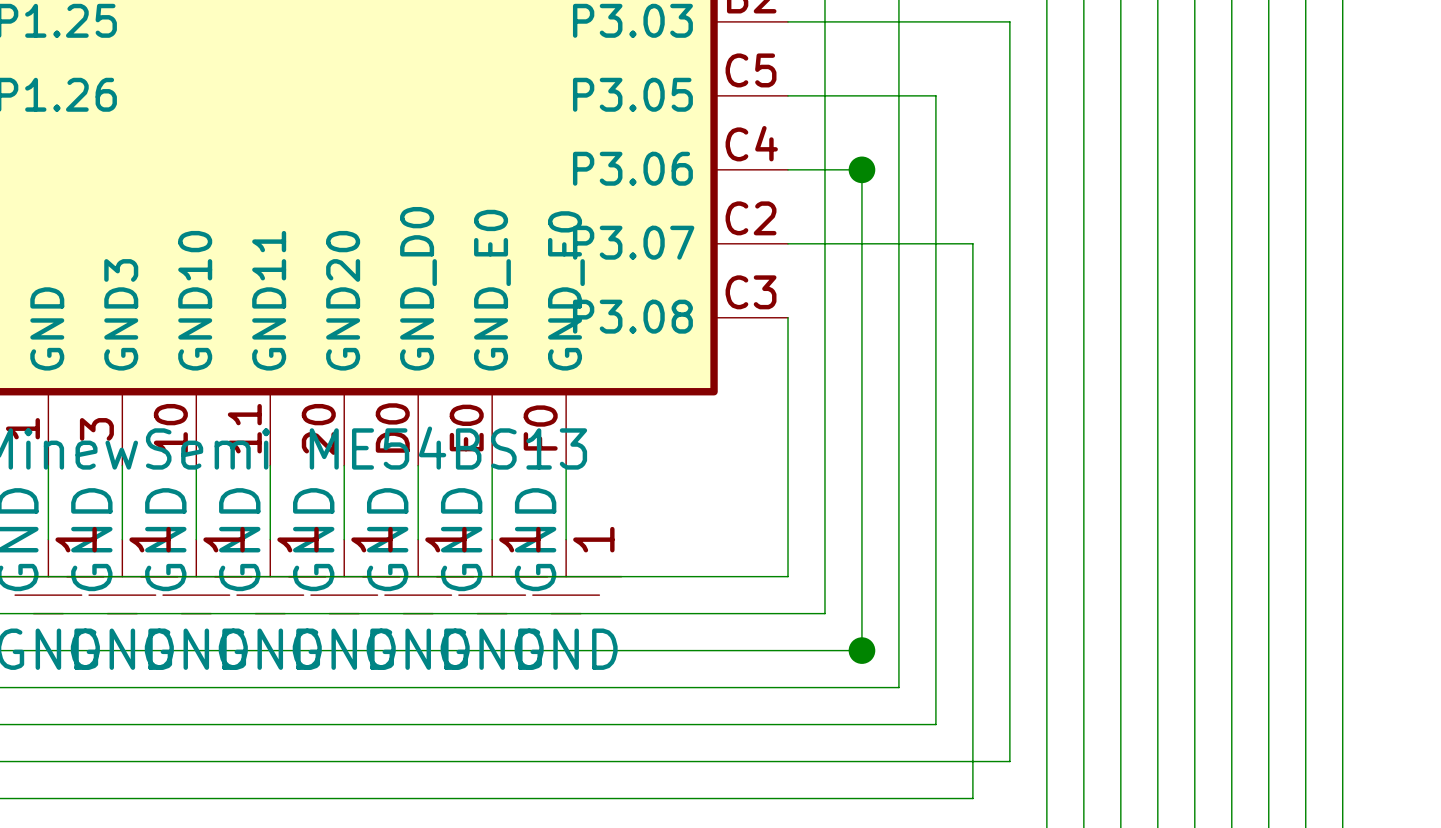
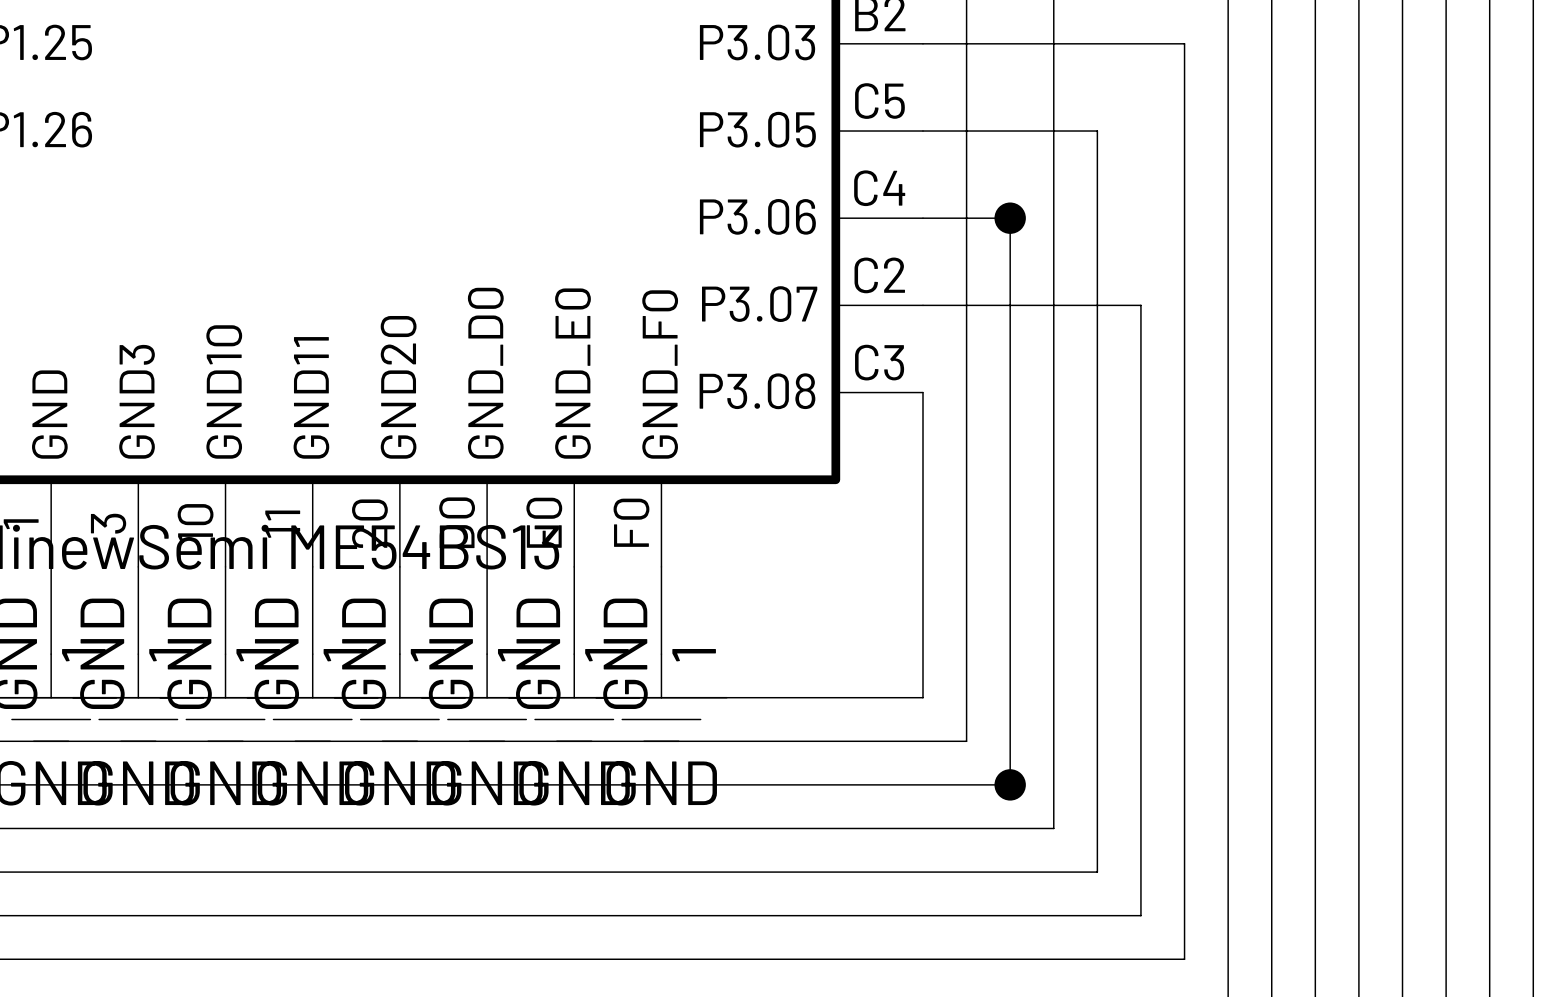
wire: (1009, 761) (972, 761) (972, 798) -> (1184, 915) (1184, 959) (1140, 959)

